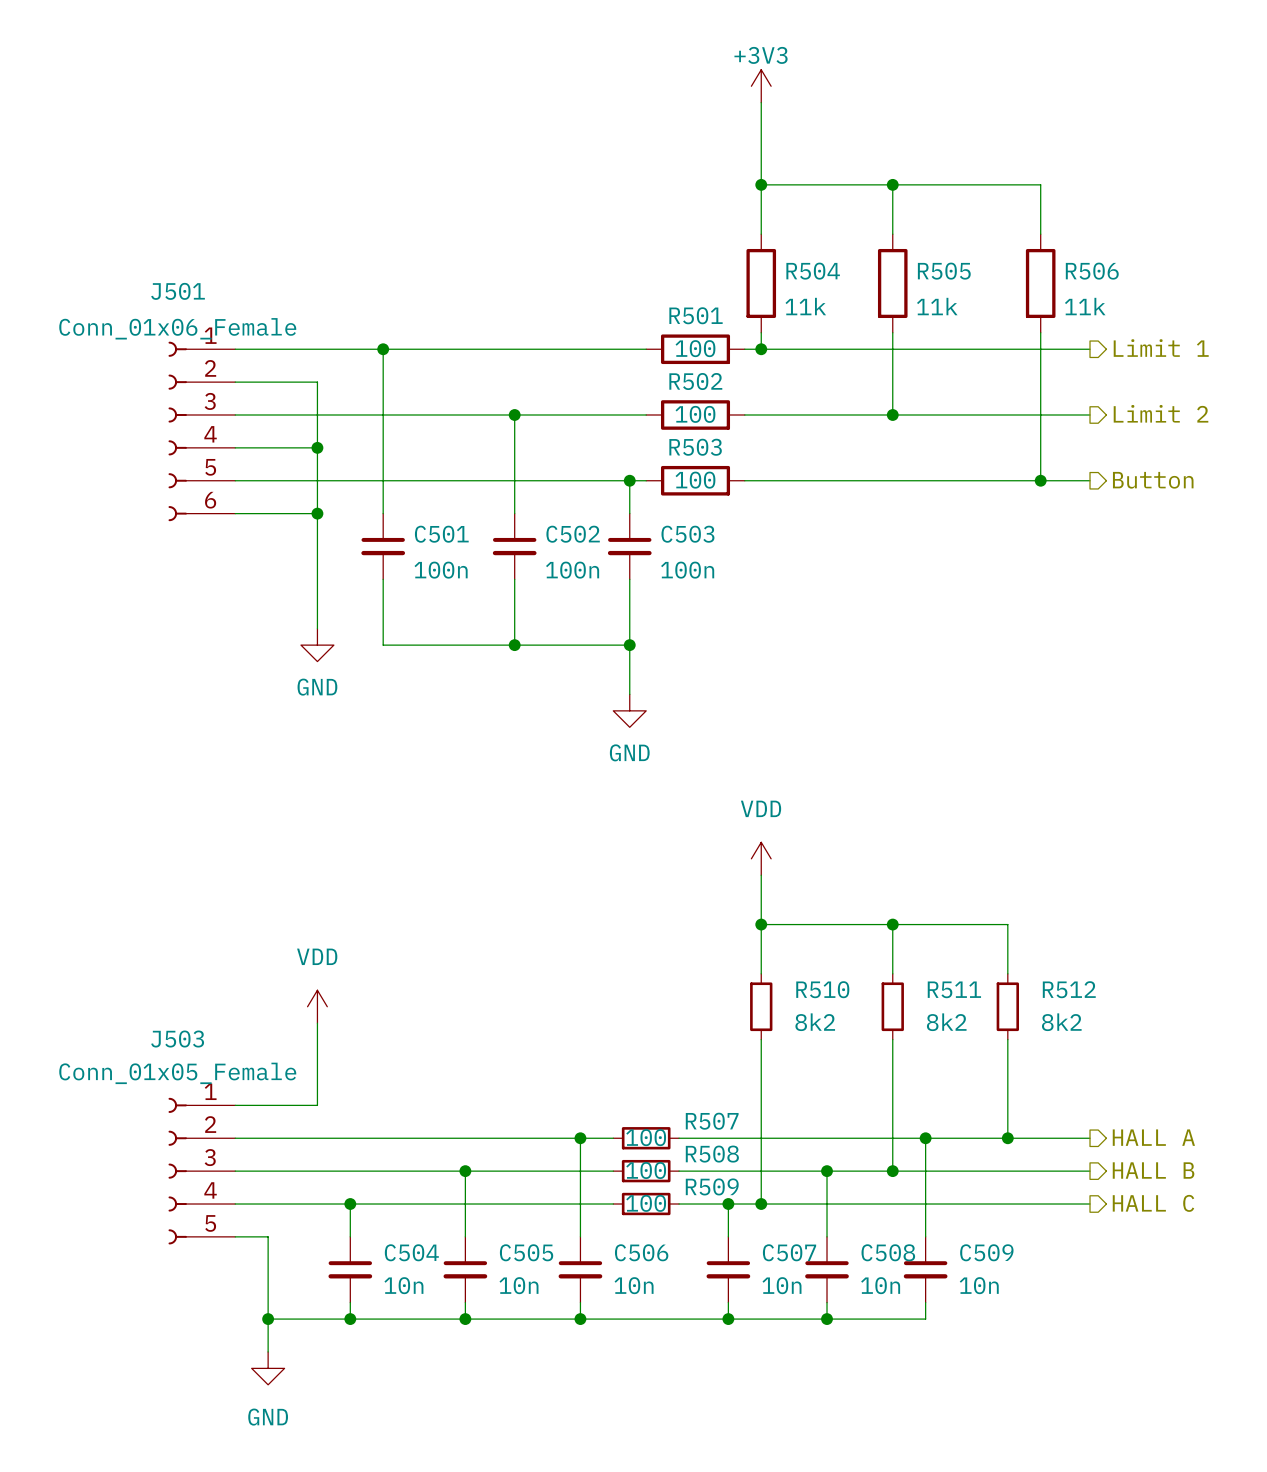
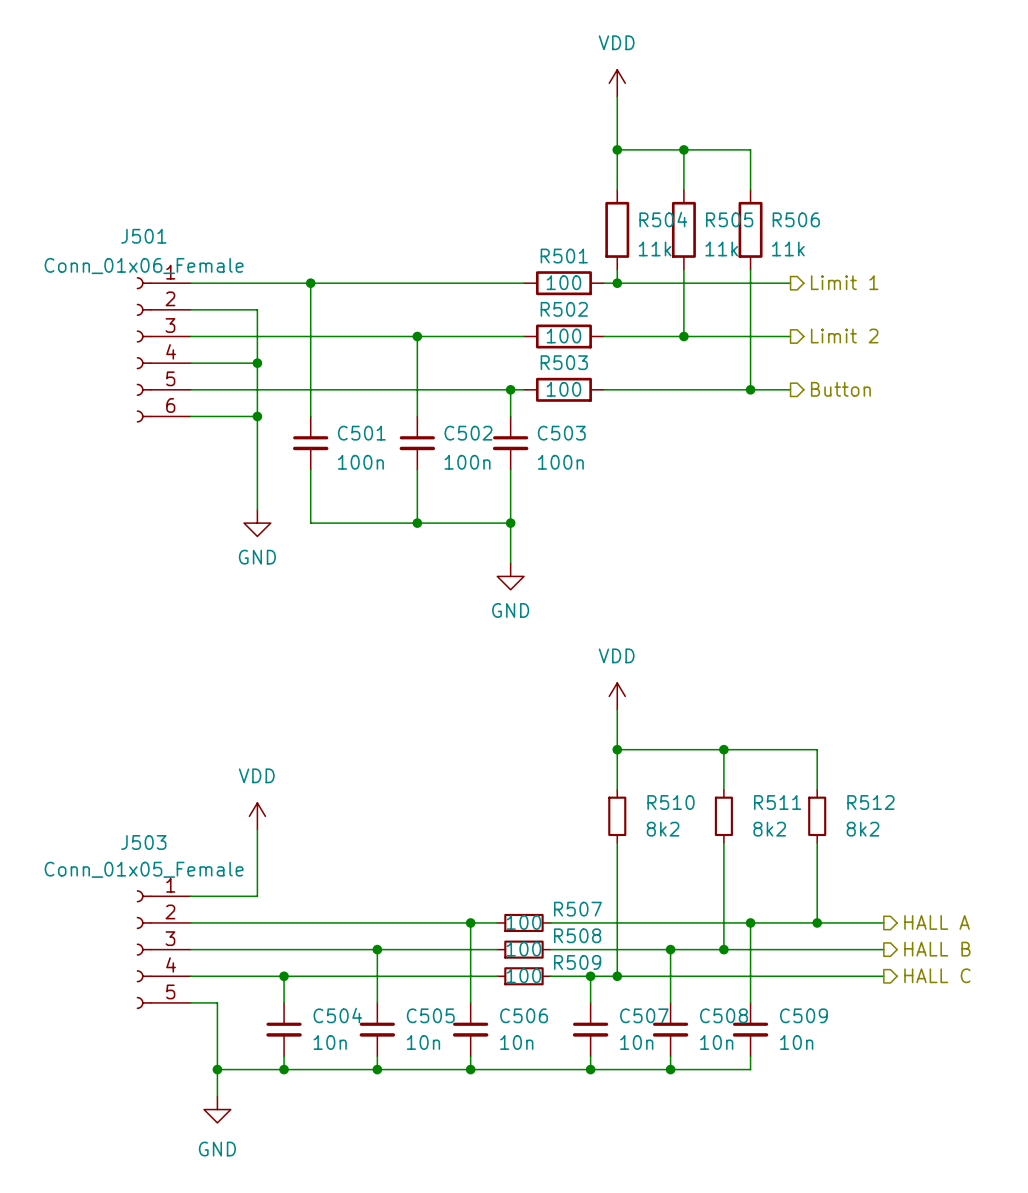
power symbol: +3V3 (761, 86) -> none
power symbol: none -> VDD (617, 83)
wire: (892, 184) (892, 234) -> (683, 149) (683, 189)
junction position: (892, 184) -> (683, 149)
wire: (925, 184) (1040, 184) (1040, 234) -> (750, 149) (750, 189)
R505 position: (892, 283) -> (683, 229)
R506 position: (1040, 283) -> (750, 229)
wire: (892, 332) (892, 414) -> (683, 269) (683, 336)
wire: (1040, 332) (1040, 480) -> (750, 269) (750, 389)
hierarchical label position: Limit 1 (1161, 348) -> Limit 1 (844, 282)
wire: (974, 349) (1090, 349) -> none
hierarchical label position: Limit 2 (1161, 413) -> Limit 2 (844, 336)
junction: none -> (683, 336)
junction: (892, 414) -> none
wire: (974, 414) (1090, 414) -> none
junction: none -> (750, 389)
wire: (974, 480) (1090, 480) -> none
junction: (1040, 480) -> none
hierarchical label position: Button (1153, 480) -> Button (840, 389)

